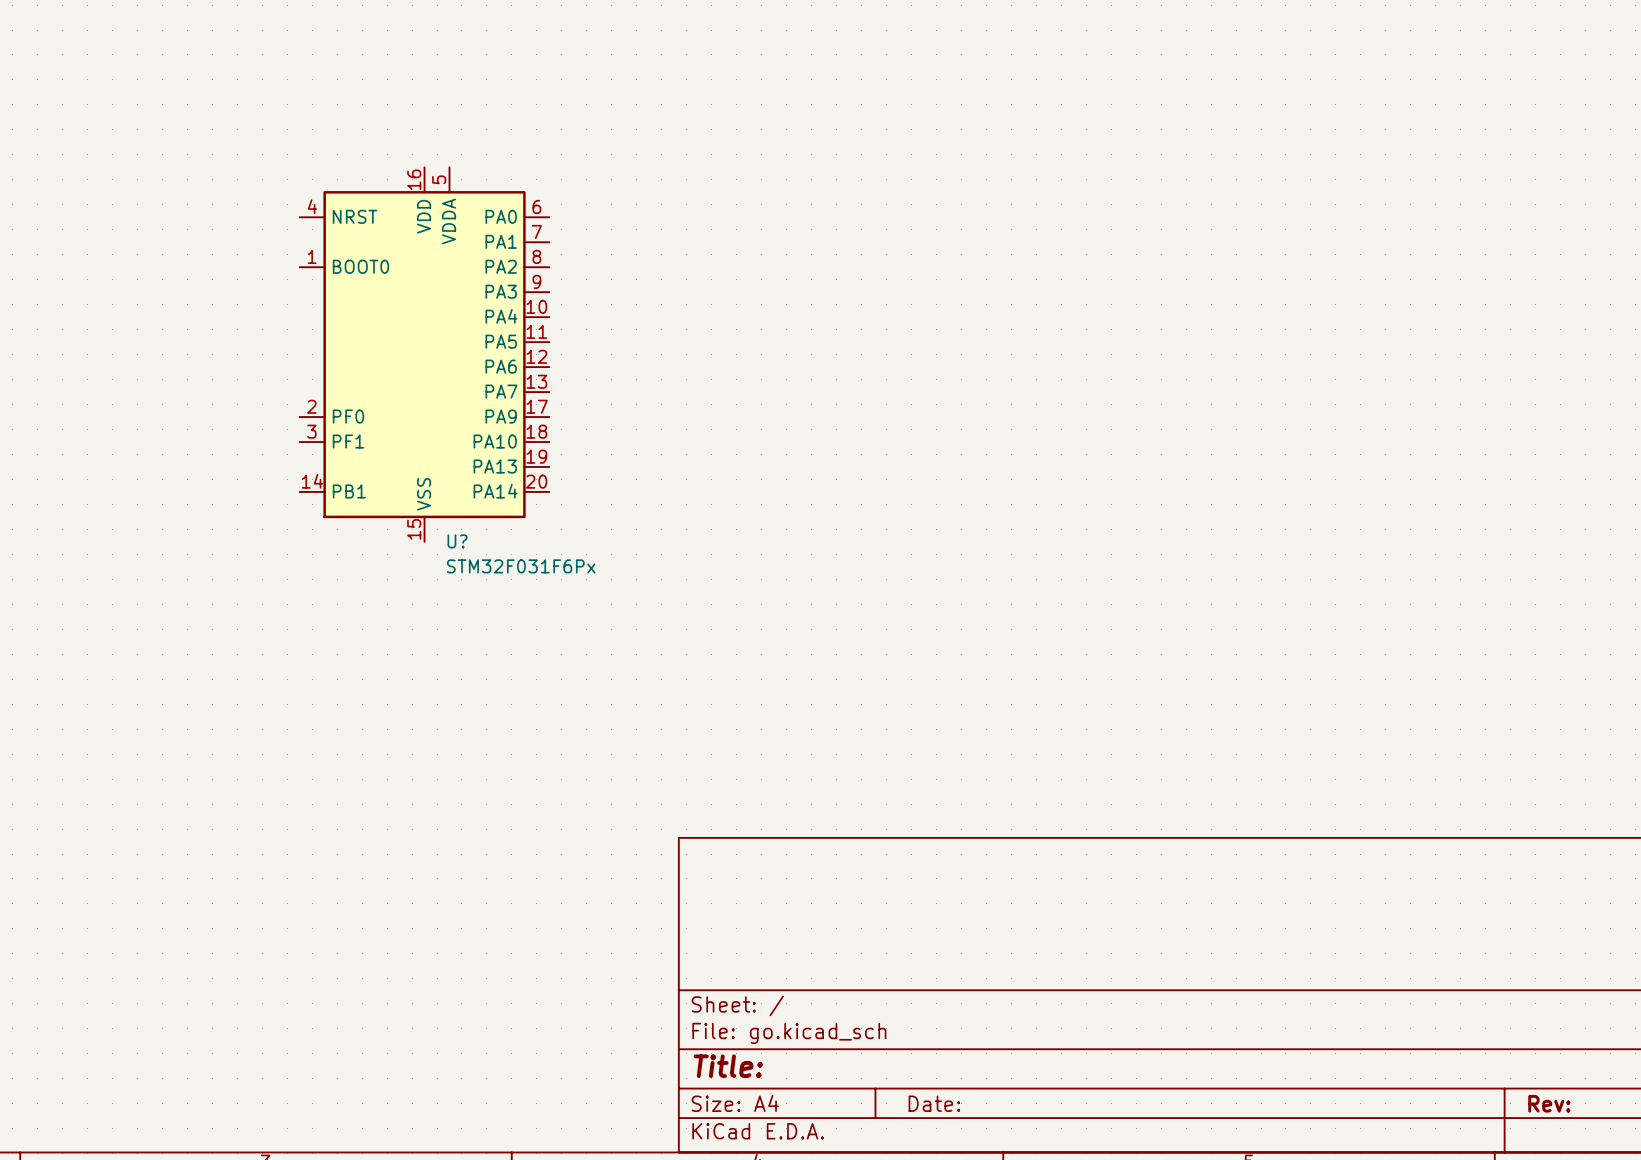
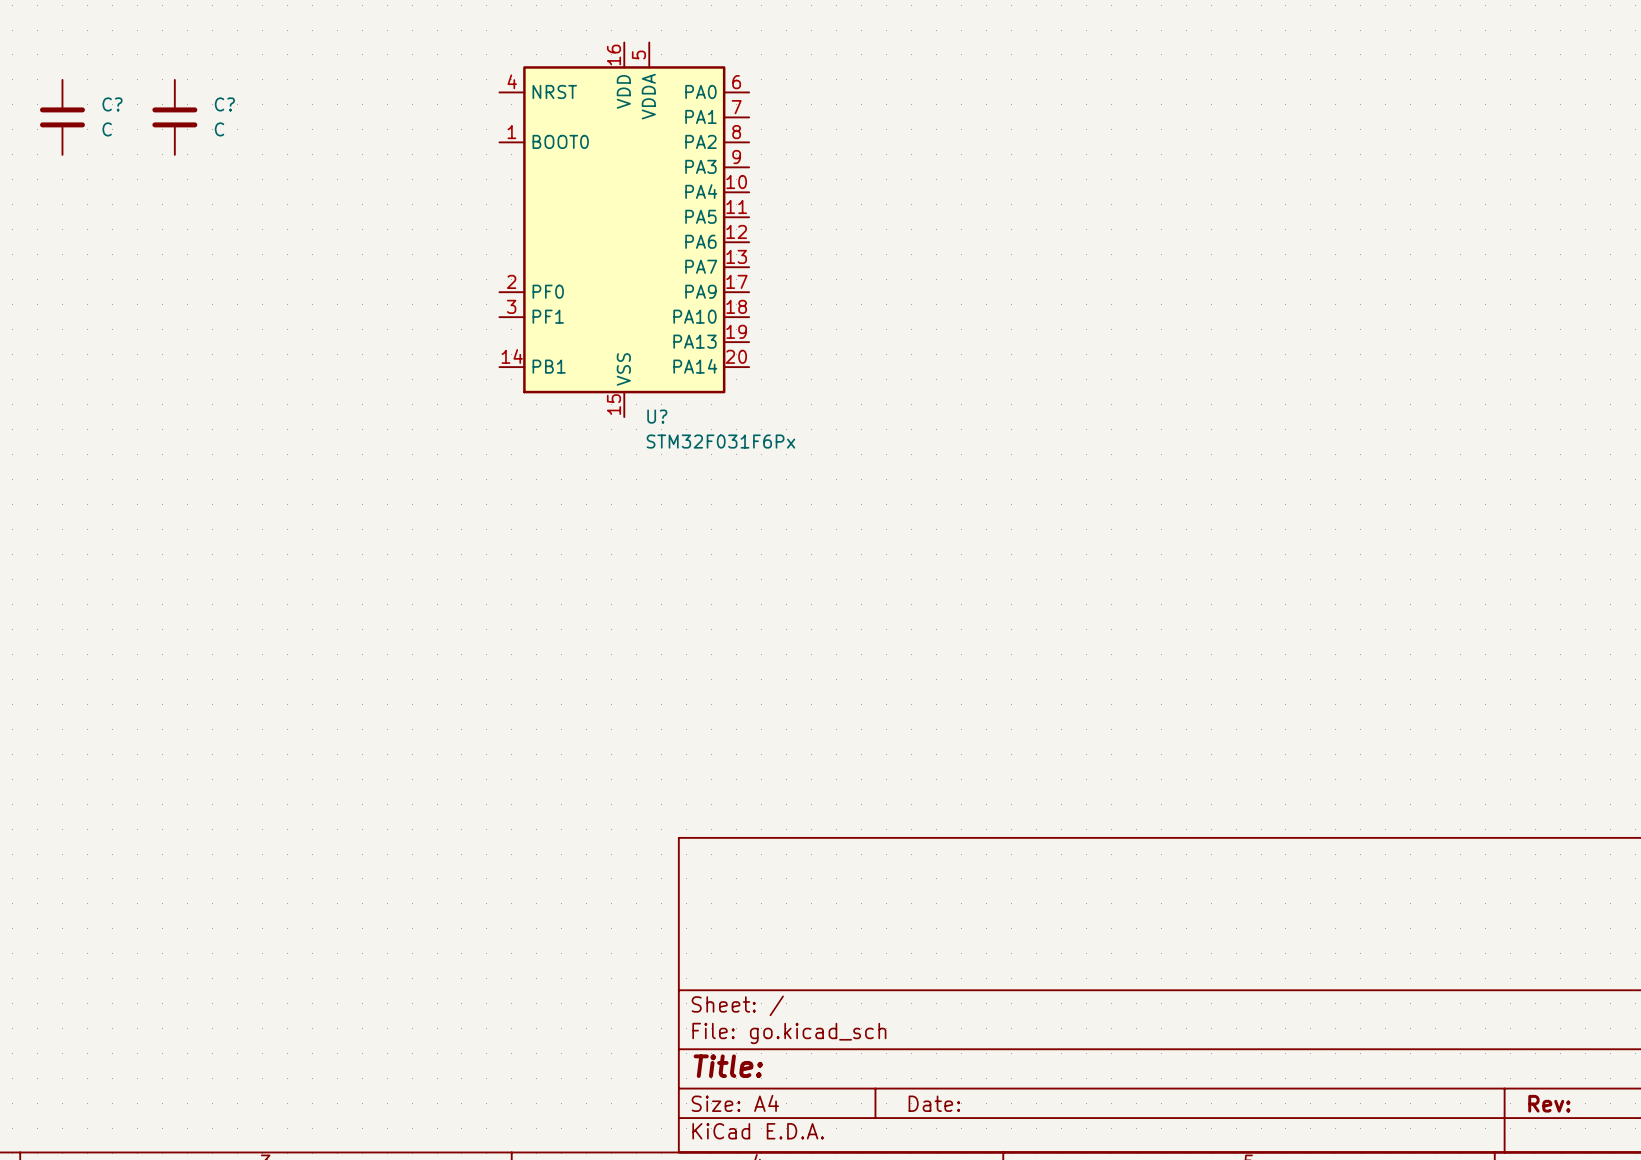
C?: none -> C (62, 117)
C?: none -> C (174, 117)
U? position: (424, 354) -> (624, 229)

